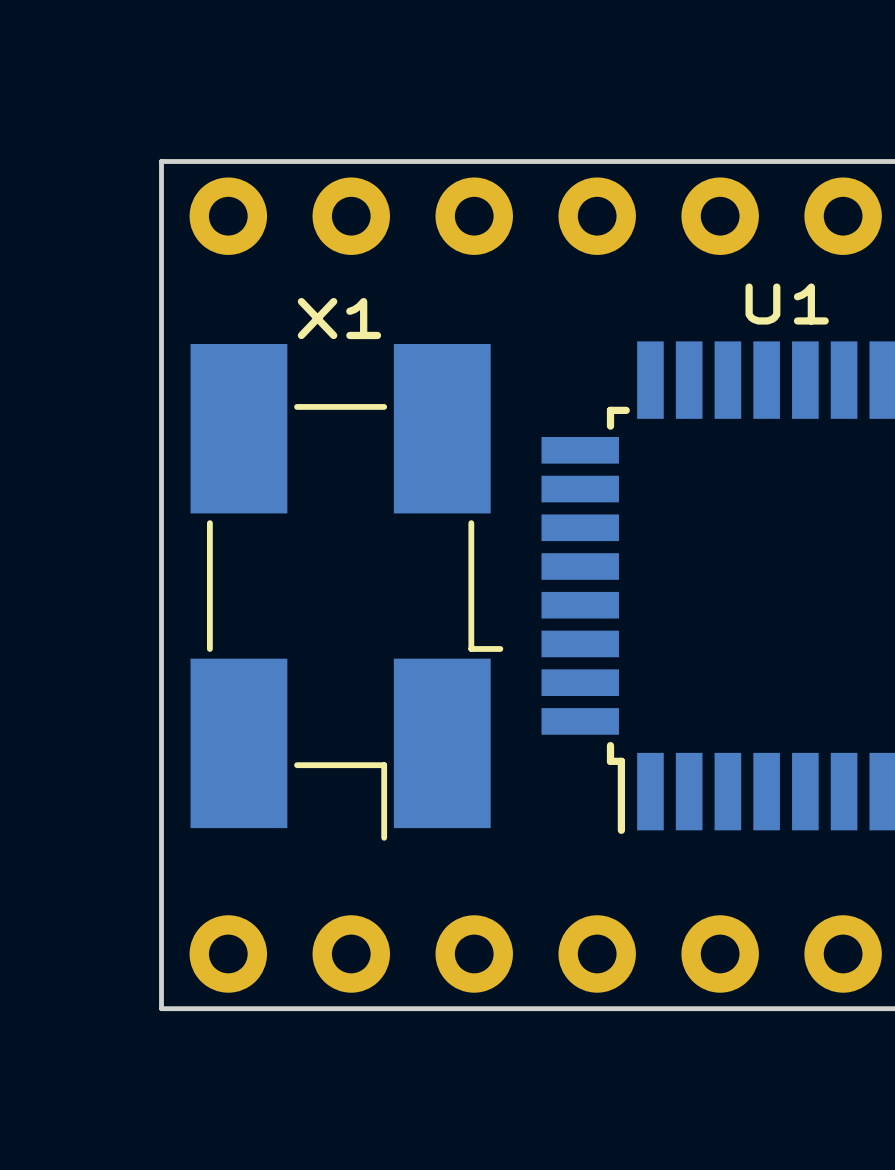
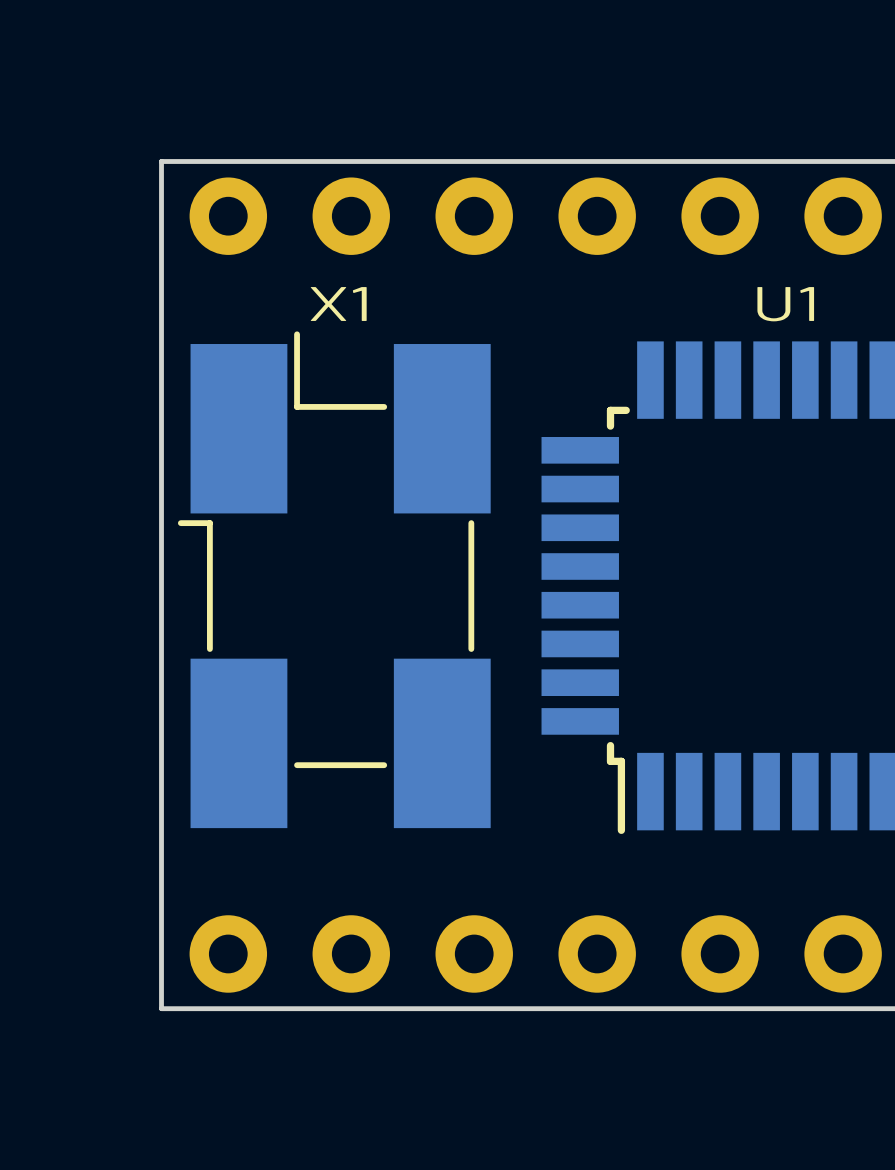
X1 rotation: 0° (346, 592) -> 180° (334, 579)

